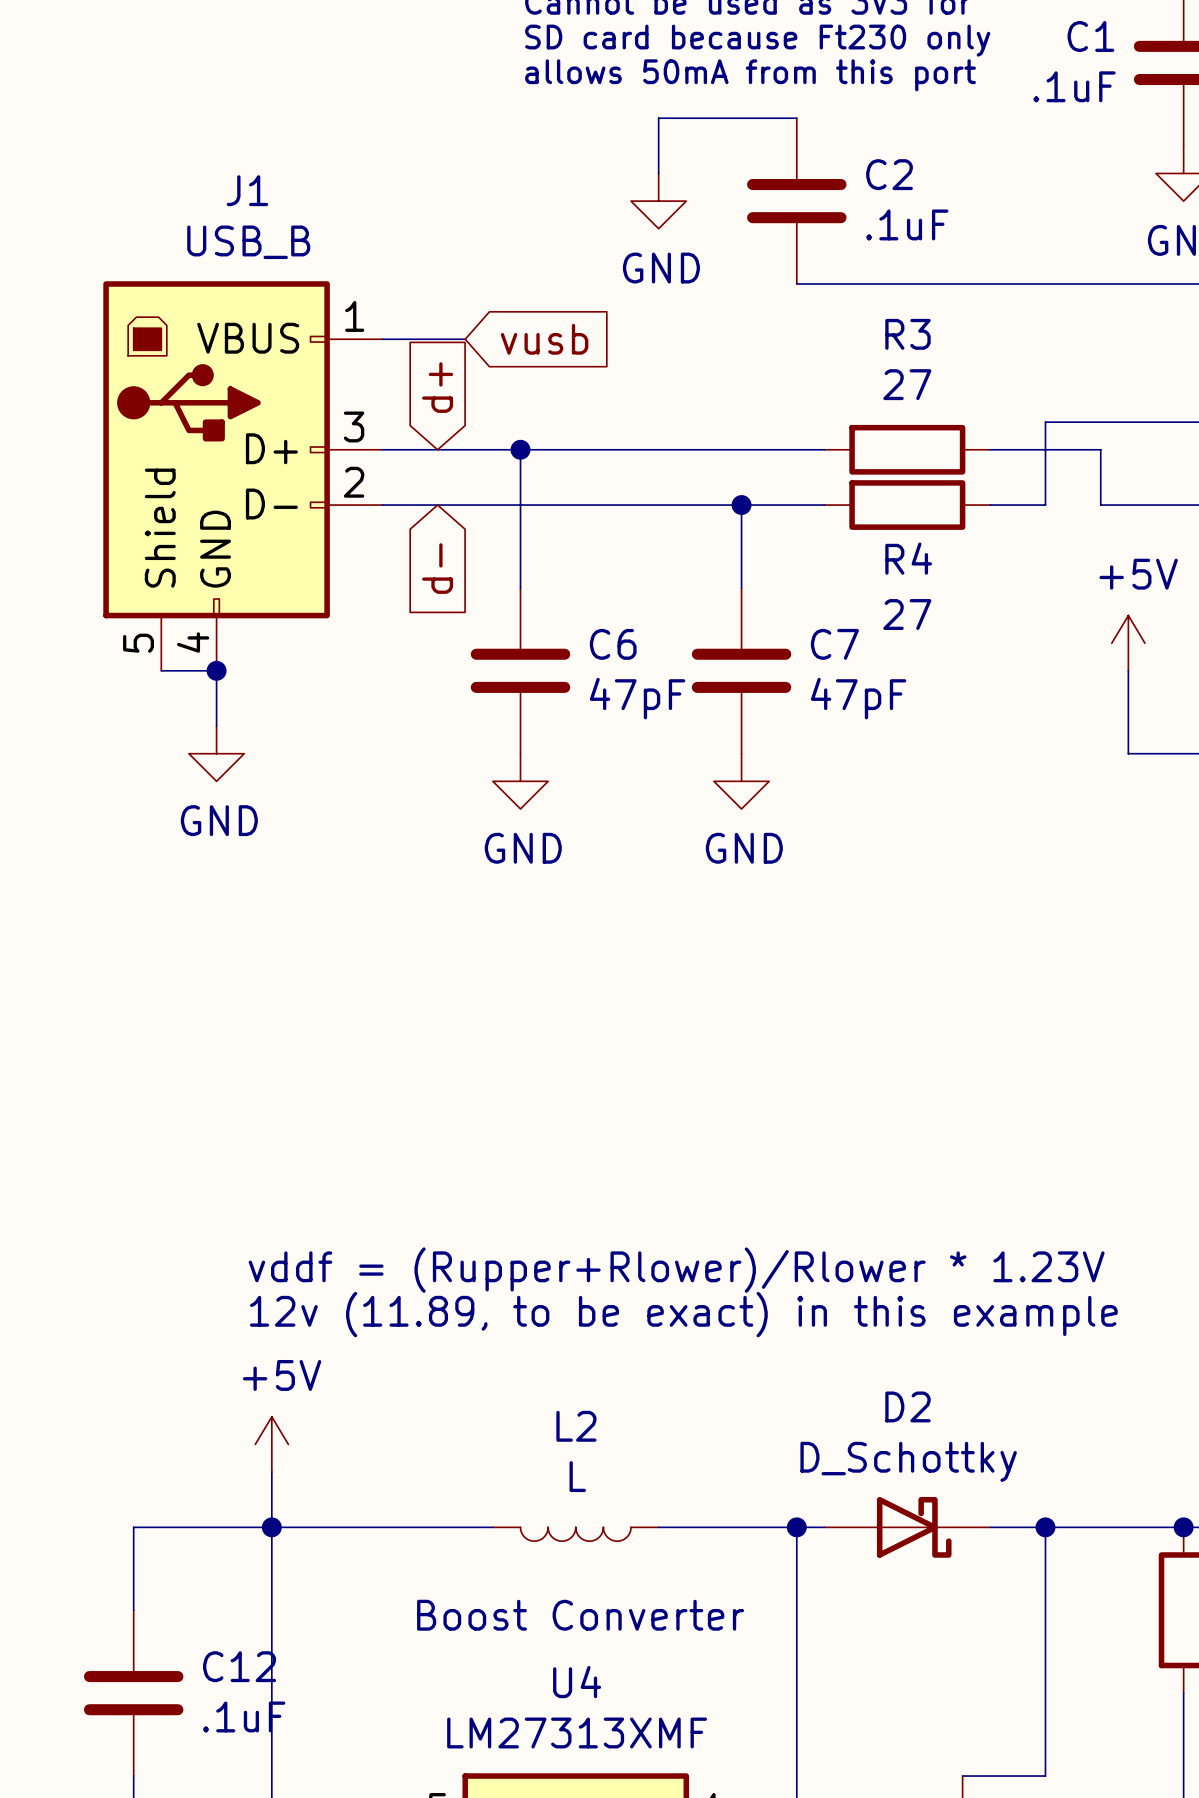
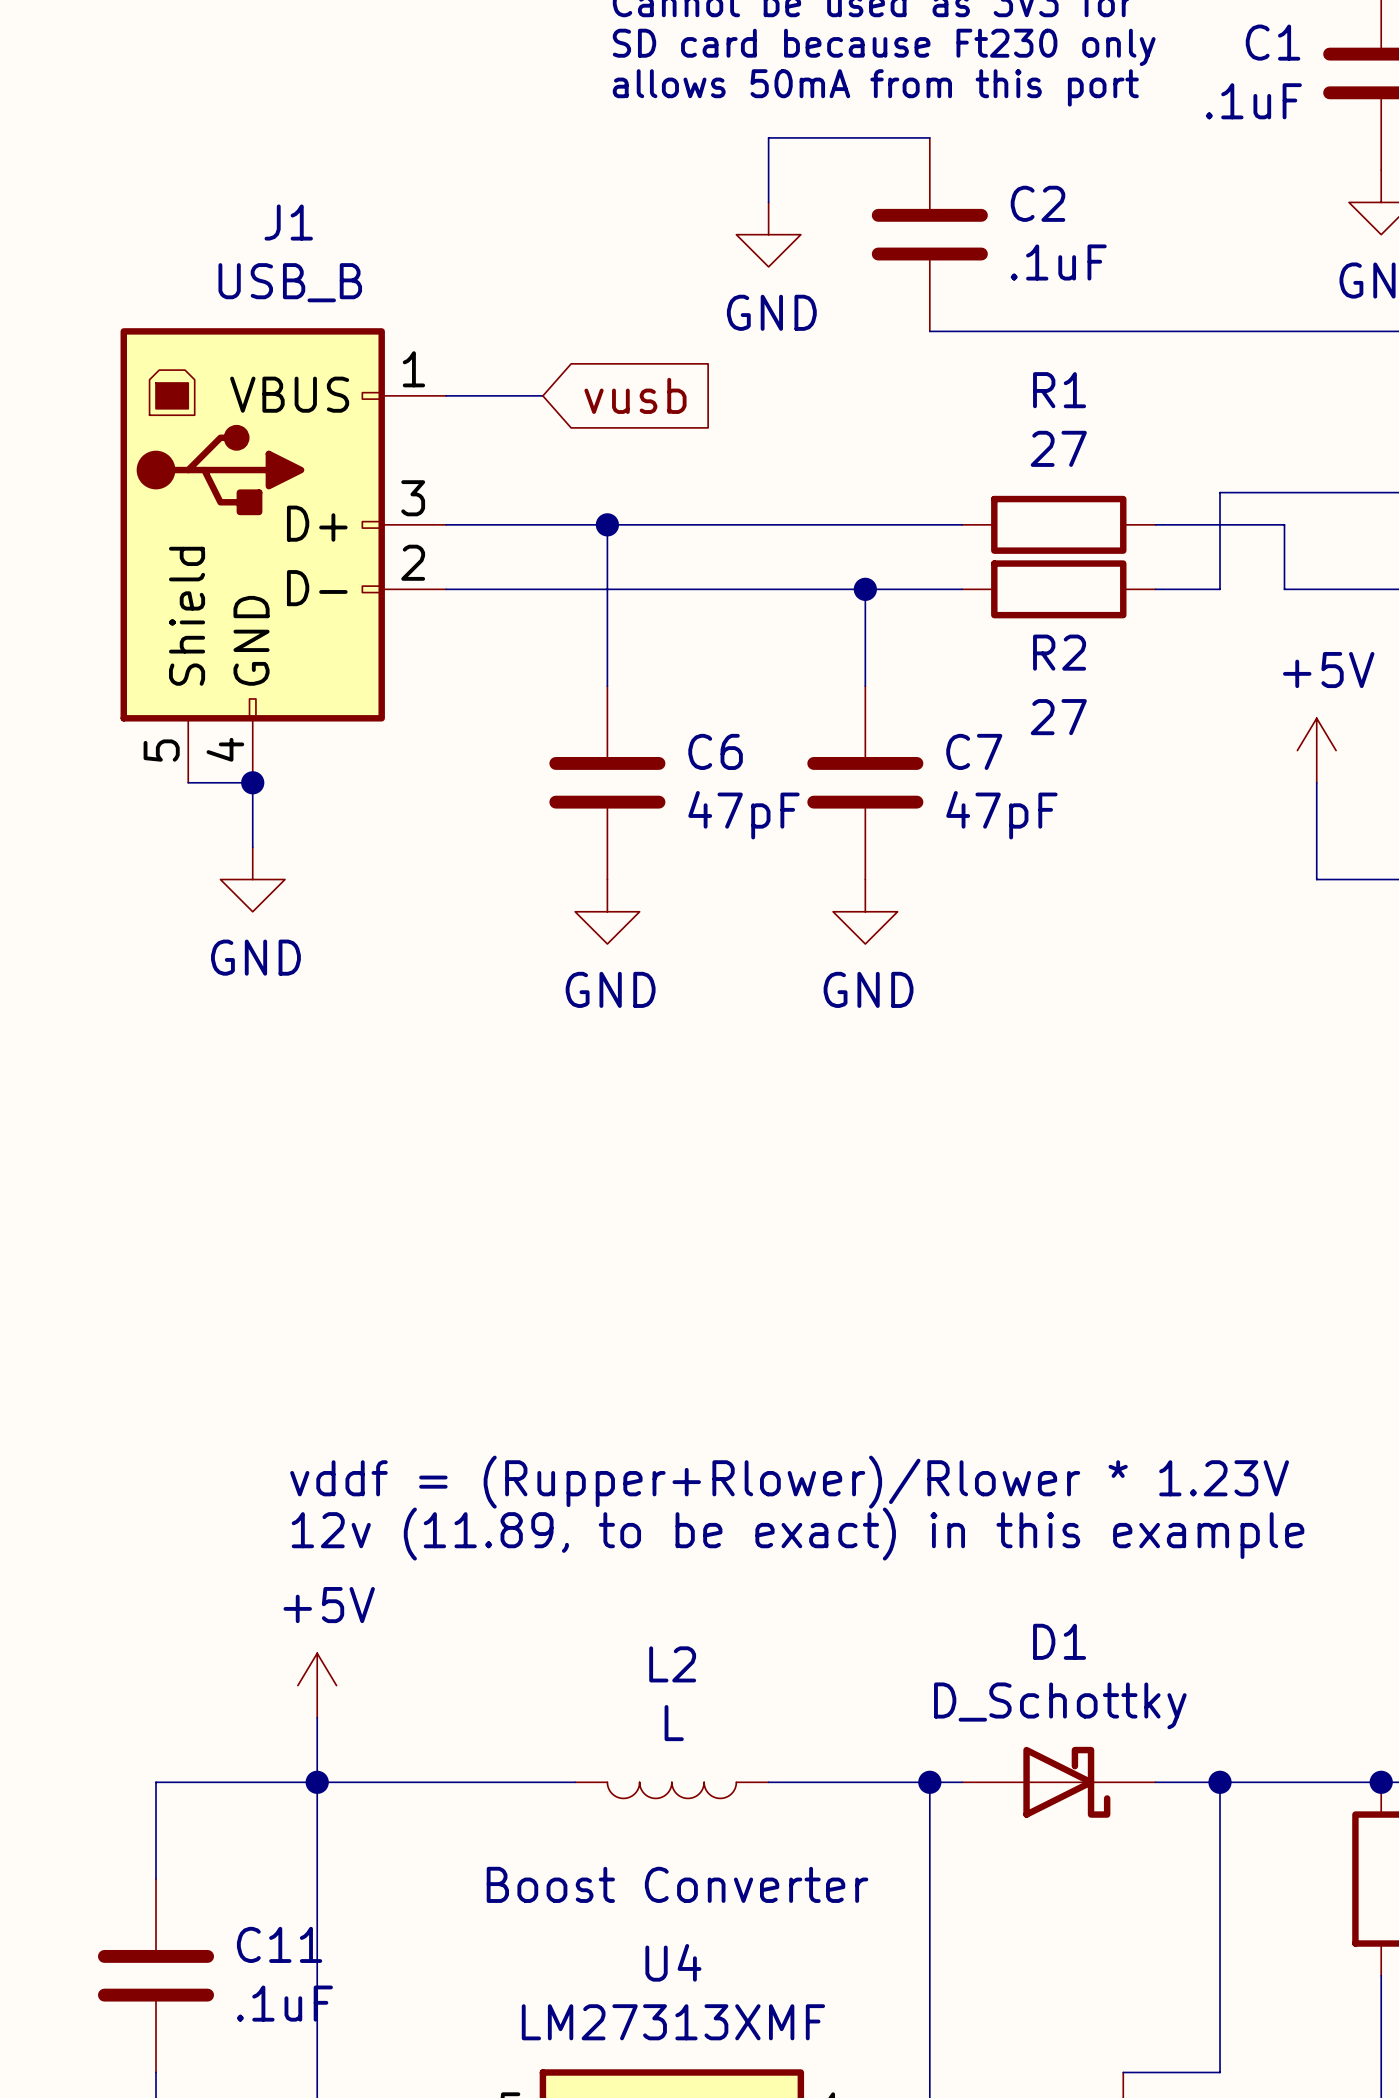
R3 name: R3 (907, 334) -> R1 (1059, 390)
global label: d+ (437, 387) -> none
R4 name: R4 (908, 558) -> R2 (1059, 652)
global label: d- (437, 568) -> none
D2 name: D2 (907, 1406) -> D1 (1059, 1641)
C12 name: C12 (239, 1666) -> C11 (279, 1944)

